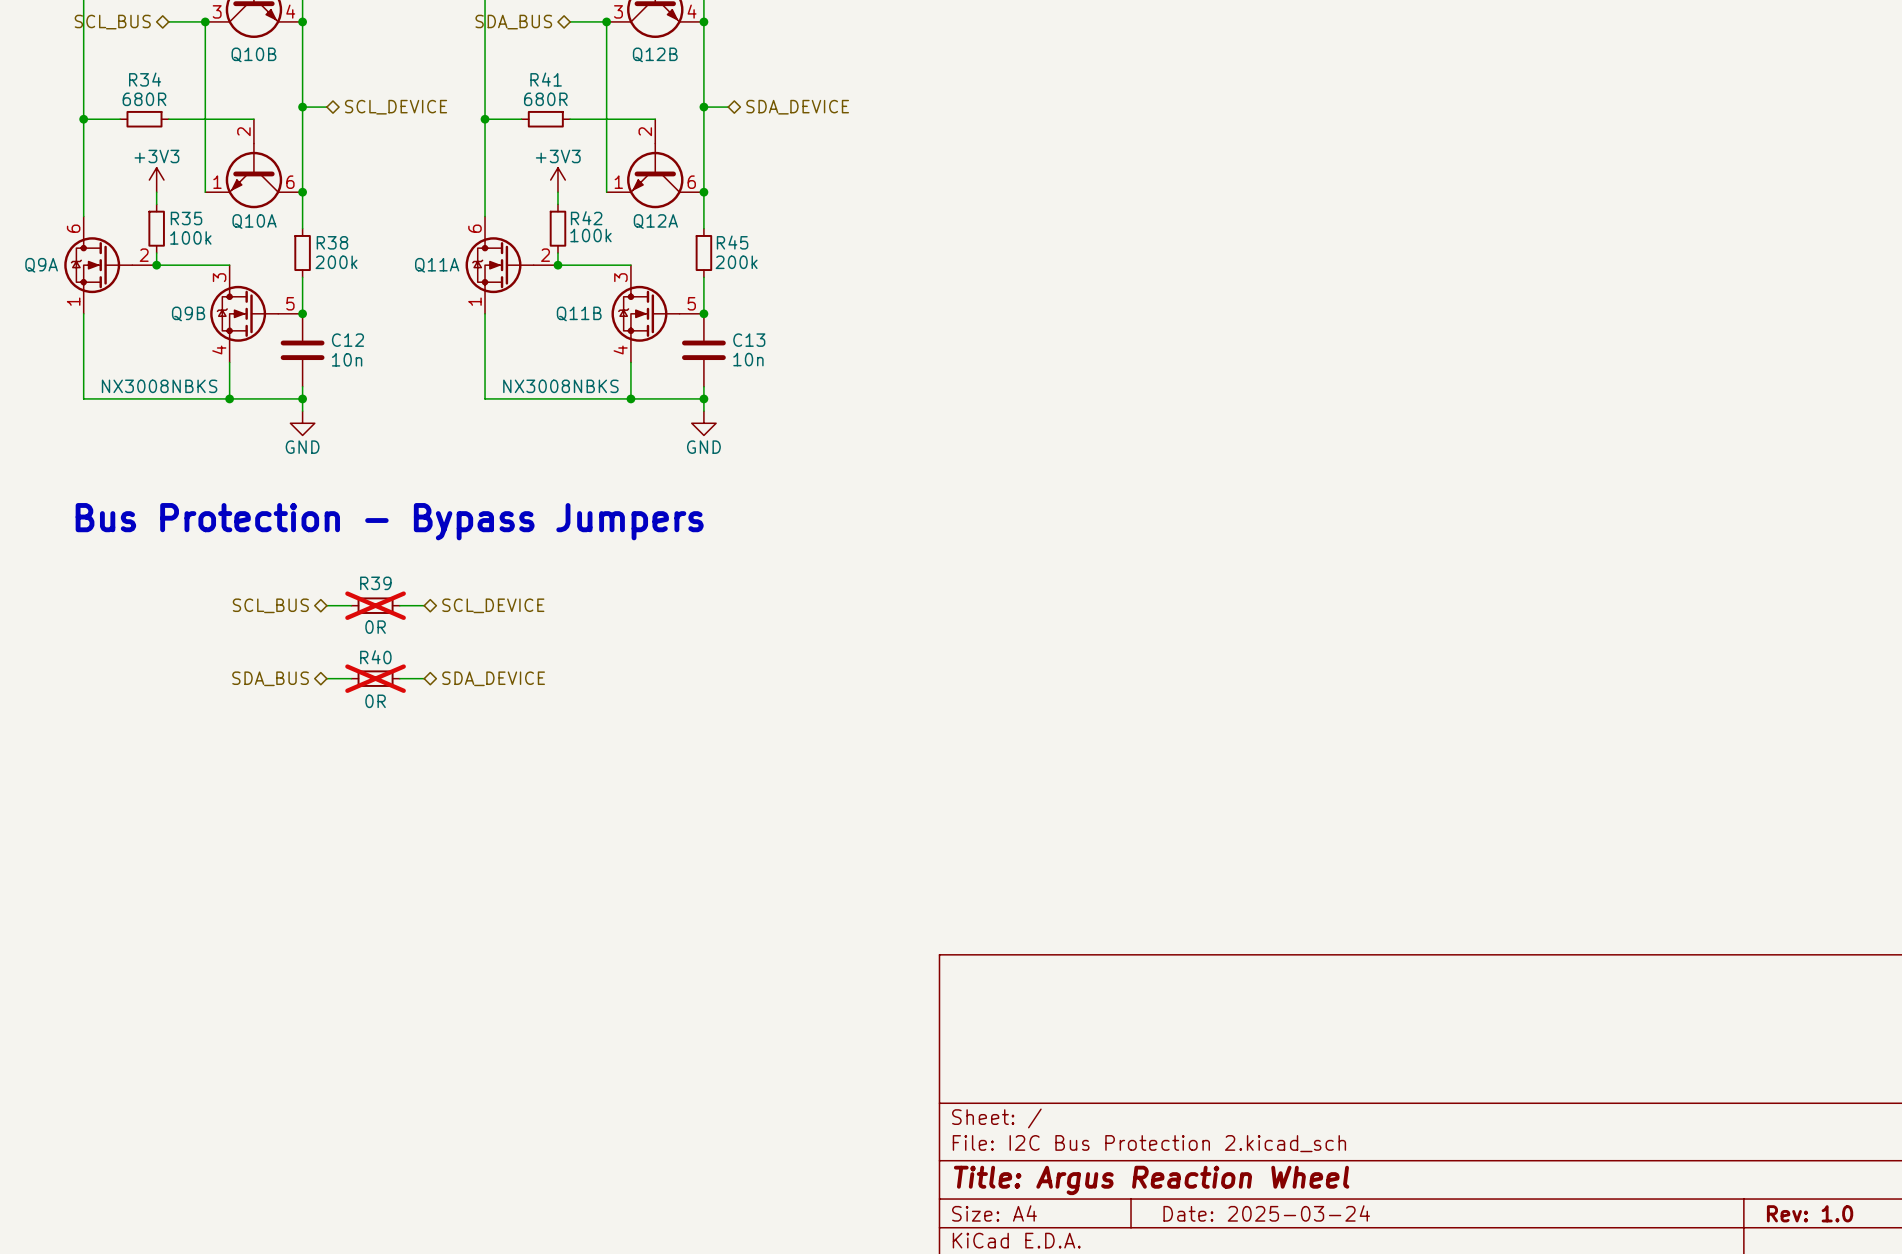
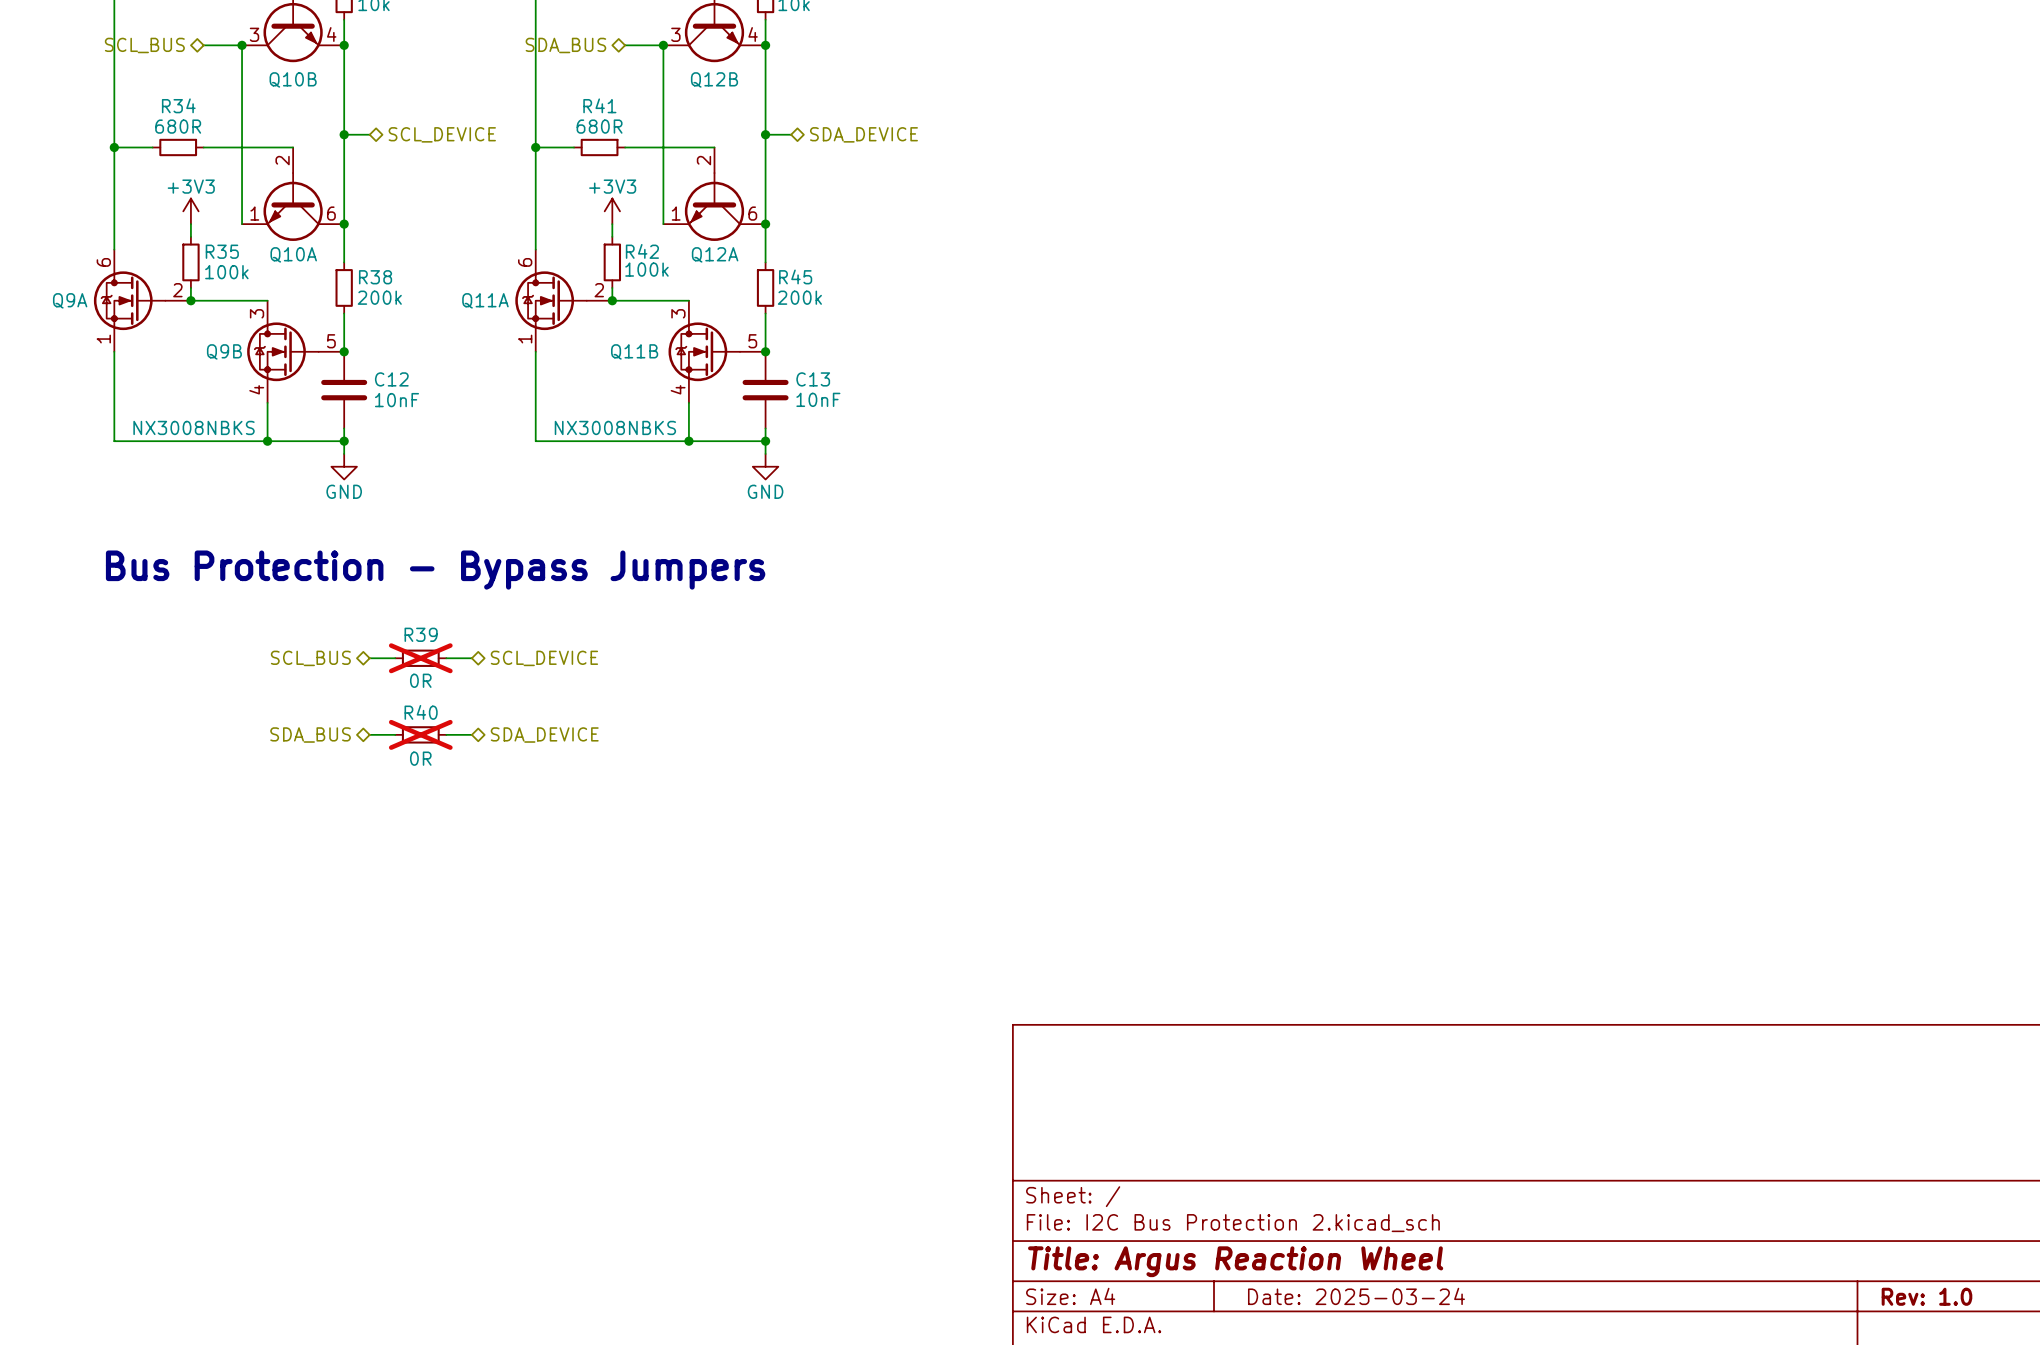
C12 value: 10n (347, 359) -> 10nF (396, 400)
C13 value: 10n (748, 359) -> 10nF (818, 399)

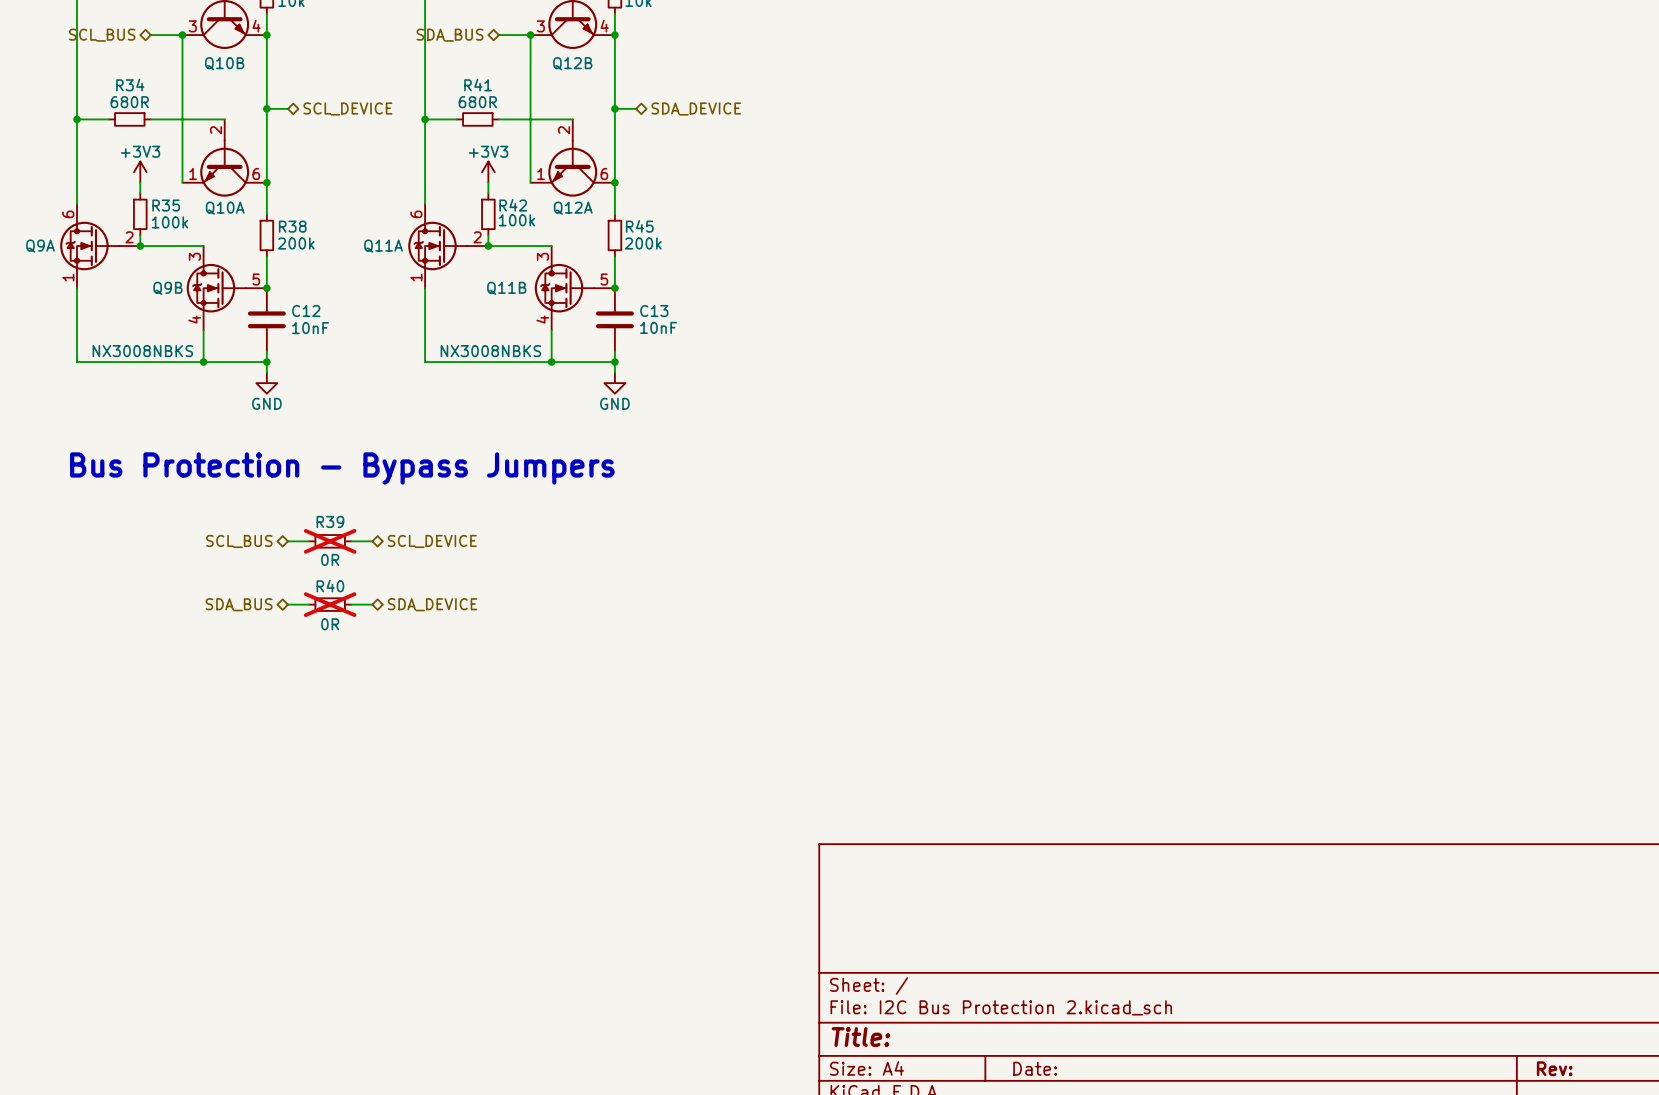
title block: Title: Argus Reaction Wheel (1235, 1261) -> Title: (861, 1037)
title block: Date: 2025-03-24 (1356, 1296) -> Date: (1035, 1068)
title block: Rev: 1.0 (1926, 1296) -> Rev: (1554, 1068)

